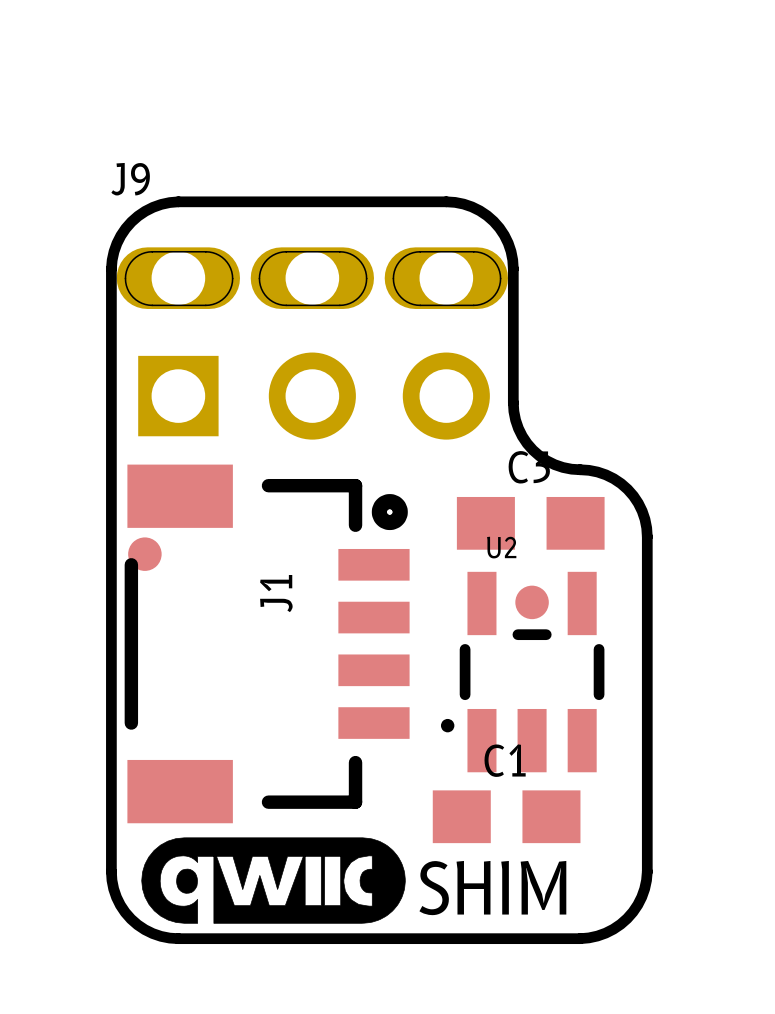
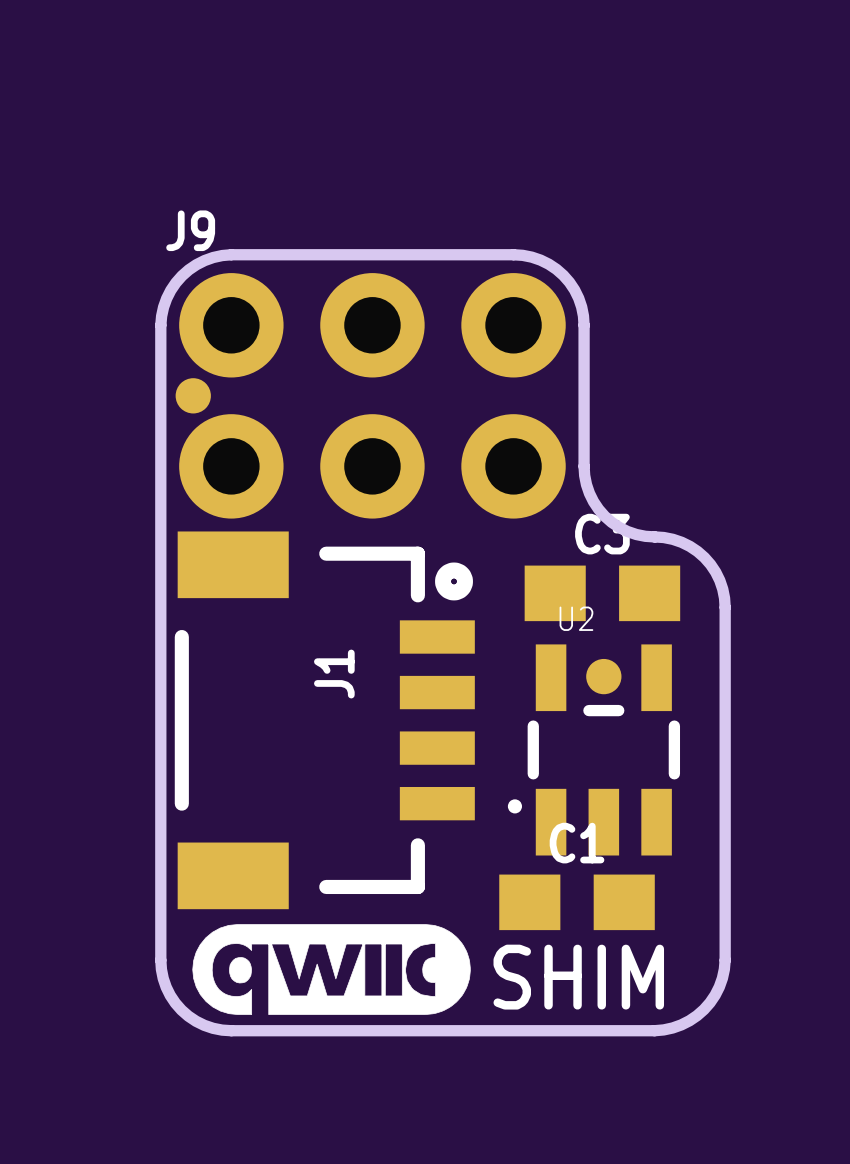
J9 footprint: [116, 247, 508, 440] -> [179, 273, 566, 519]
part position: (144, 554) -> (193, 395)

